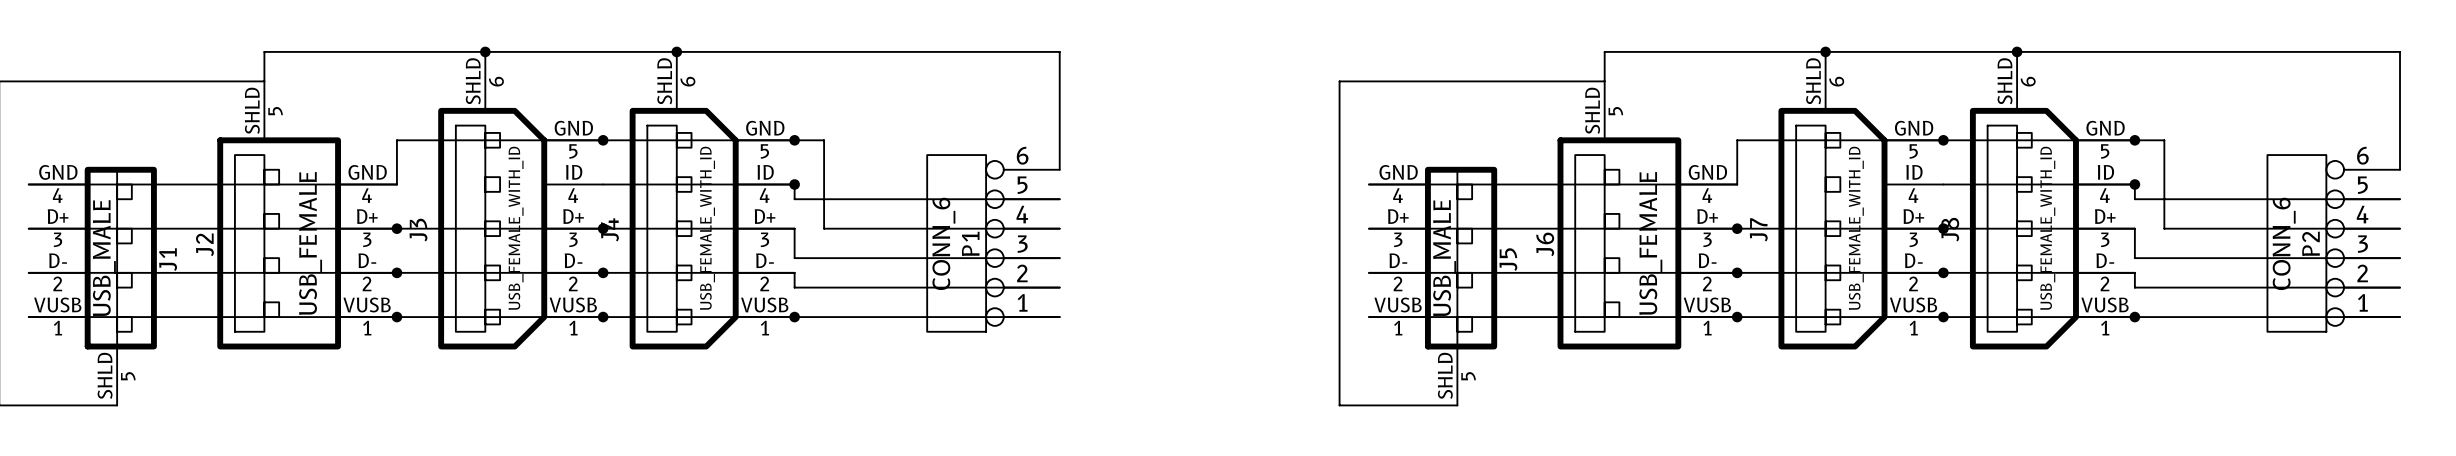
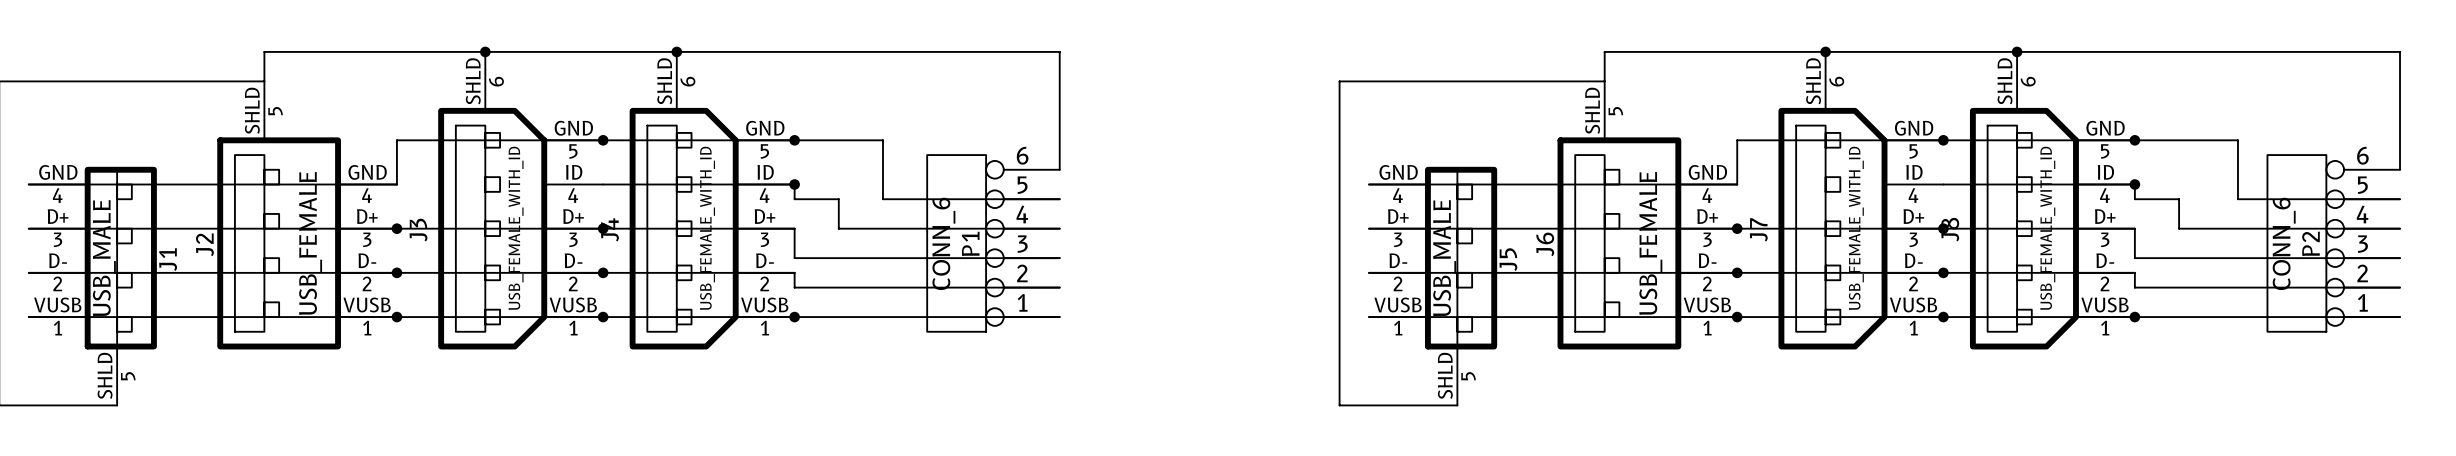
wire: (824, 140) (824, 228) (838, 228) -> (824, 140) (882, 140) (882, 199)
wire: (2164, 140) (2164, 228) (2179, 228) -> (2179, 199) (2179, 228)
wire: (838, 199) (882, 199) -> (838, 199) (838, 228)
wire: (2179, 199) (2237, 199) -> (2164, 140) (2237, 140) (2237, 199)

